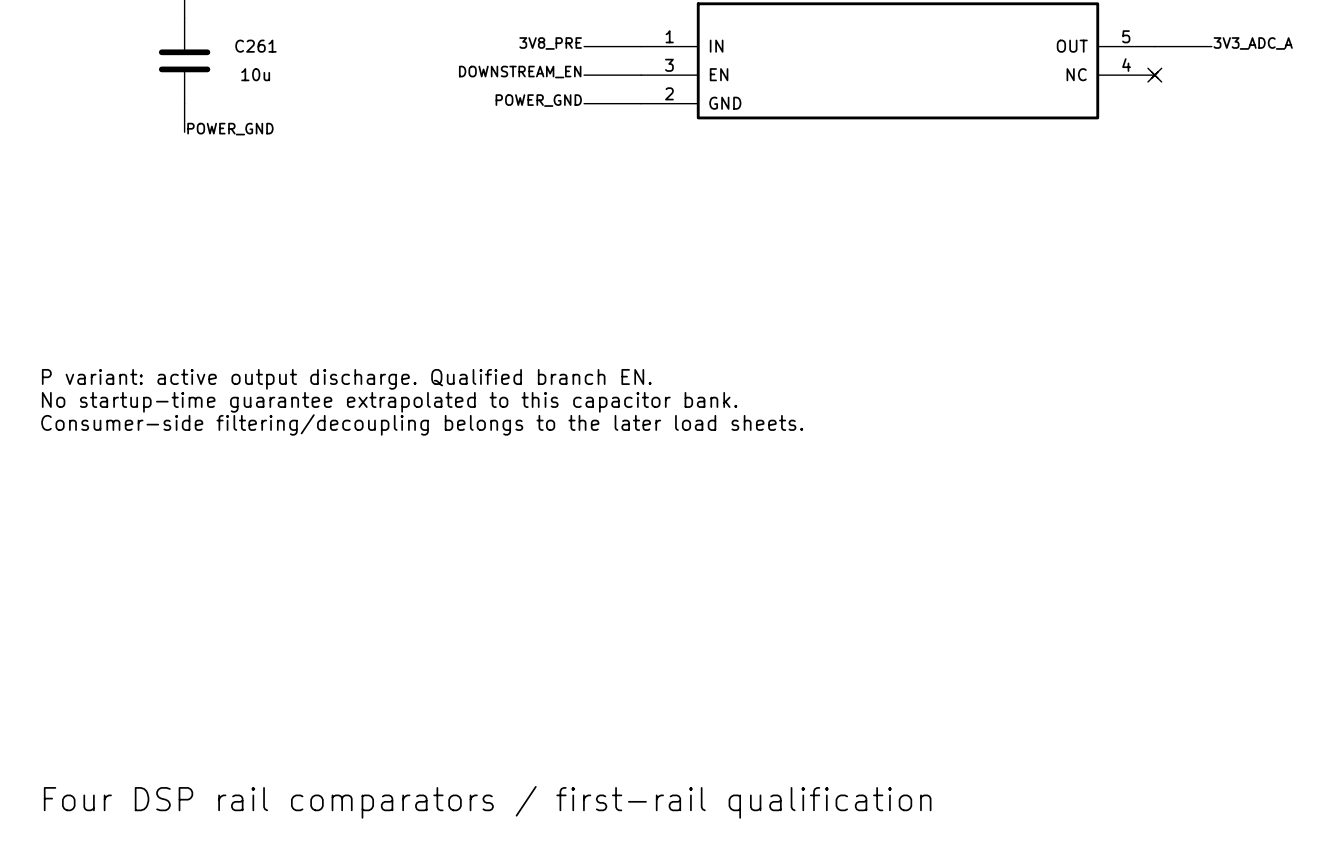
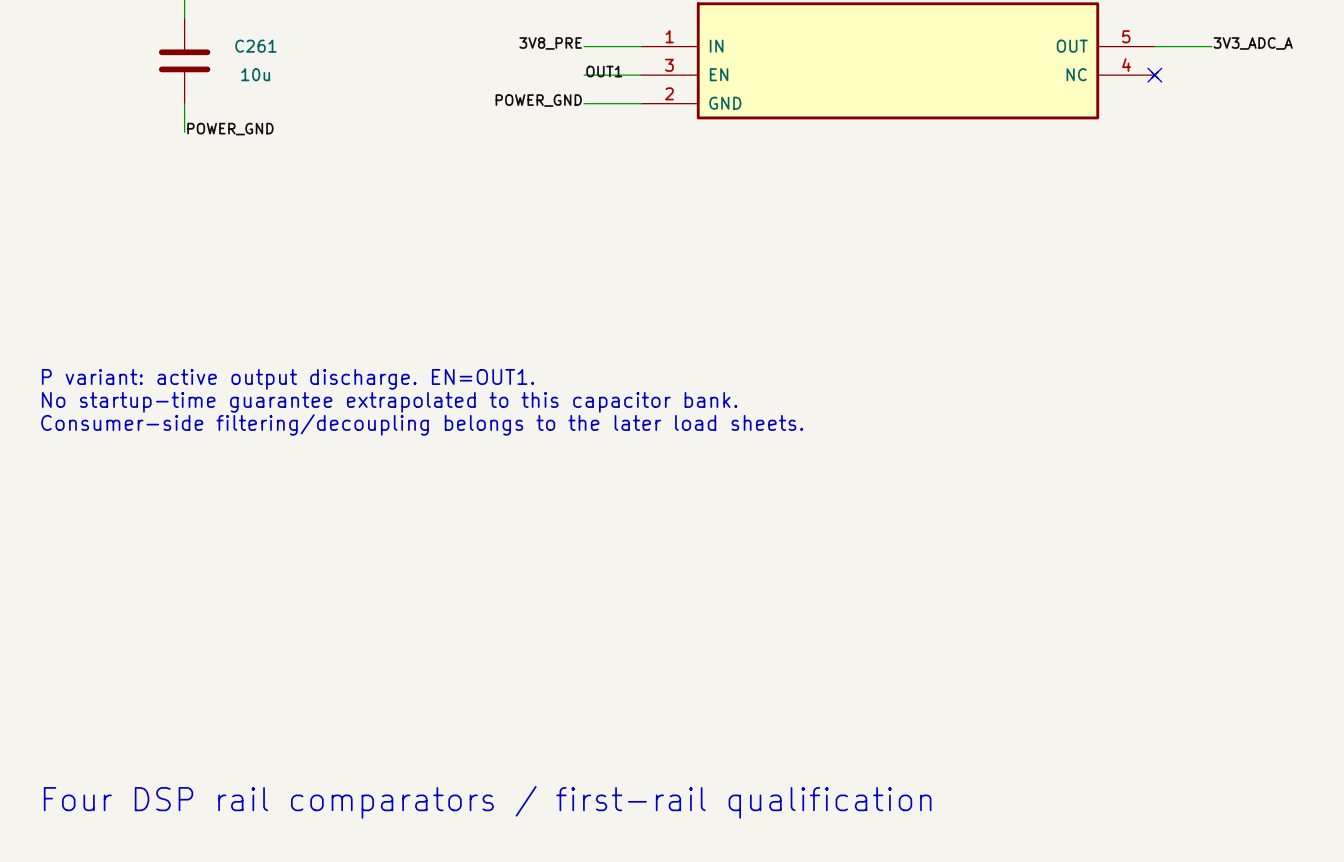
label: DOWNSTREAM_EN (520, 72) -> OUT1 (604, 71)
text: P variant: active output discharge. Qualified branch EN. (346, 379) -> P variant: active output discharge. EN=OUT1. (288, 379)

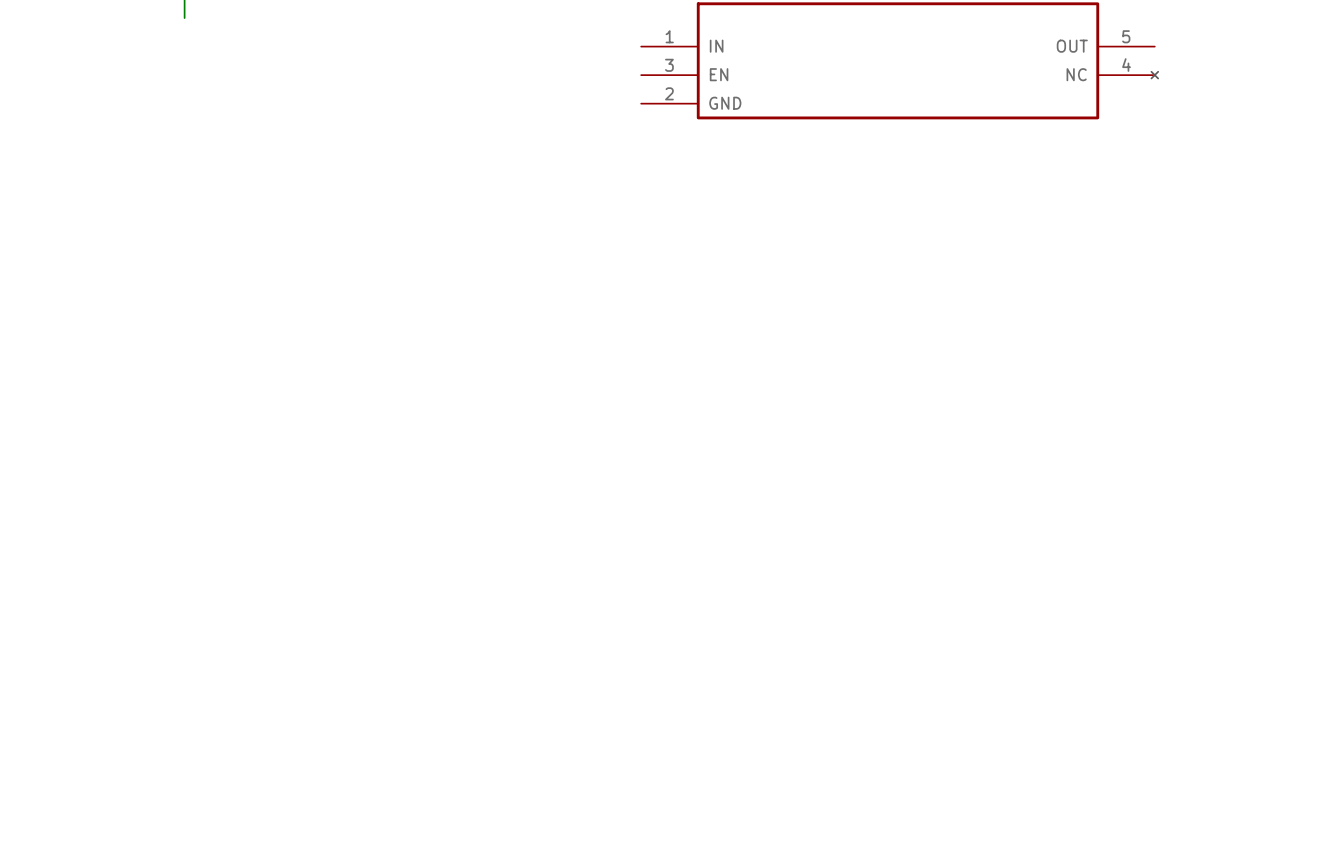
label: 3V8_PRE (550, 43) -> none
label: 3V3_ADC_A (1253, 43) -> none
wire: (584, 46) (641, 46) -> none
wire: (1154, 46) (1211, 46) -> none
C261: 10u (184, 60) -> none
label: OUT1 (604, 71) -> none
wire: (584, 75) (641, 75) -> none
no-connect mark: (1154, 75) -> none
label: POWER_GND (538, 100) -> none
wire: (184, 103) (184, 132) -> none
wire: (584, 103) (641, 103) -> none
label: POWER_GND (230, 129) -> none
text: P variant: active output discharge. EN=OUT1. (288, 379) -> none
text: No startup-time guarantee extrapolated to this capacitor bank. (389, 402) -> none
text: Consumer-side filtering/decoupling belongs to the later load sheets. (422, 424) -> none
text: Four DSP rail comparators / first-rail qualification (487, 802) -> none

